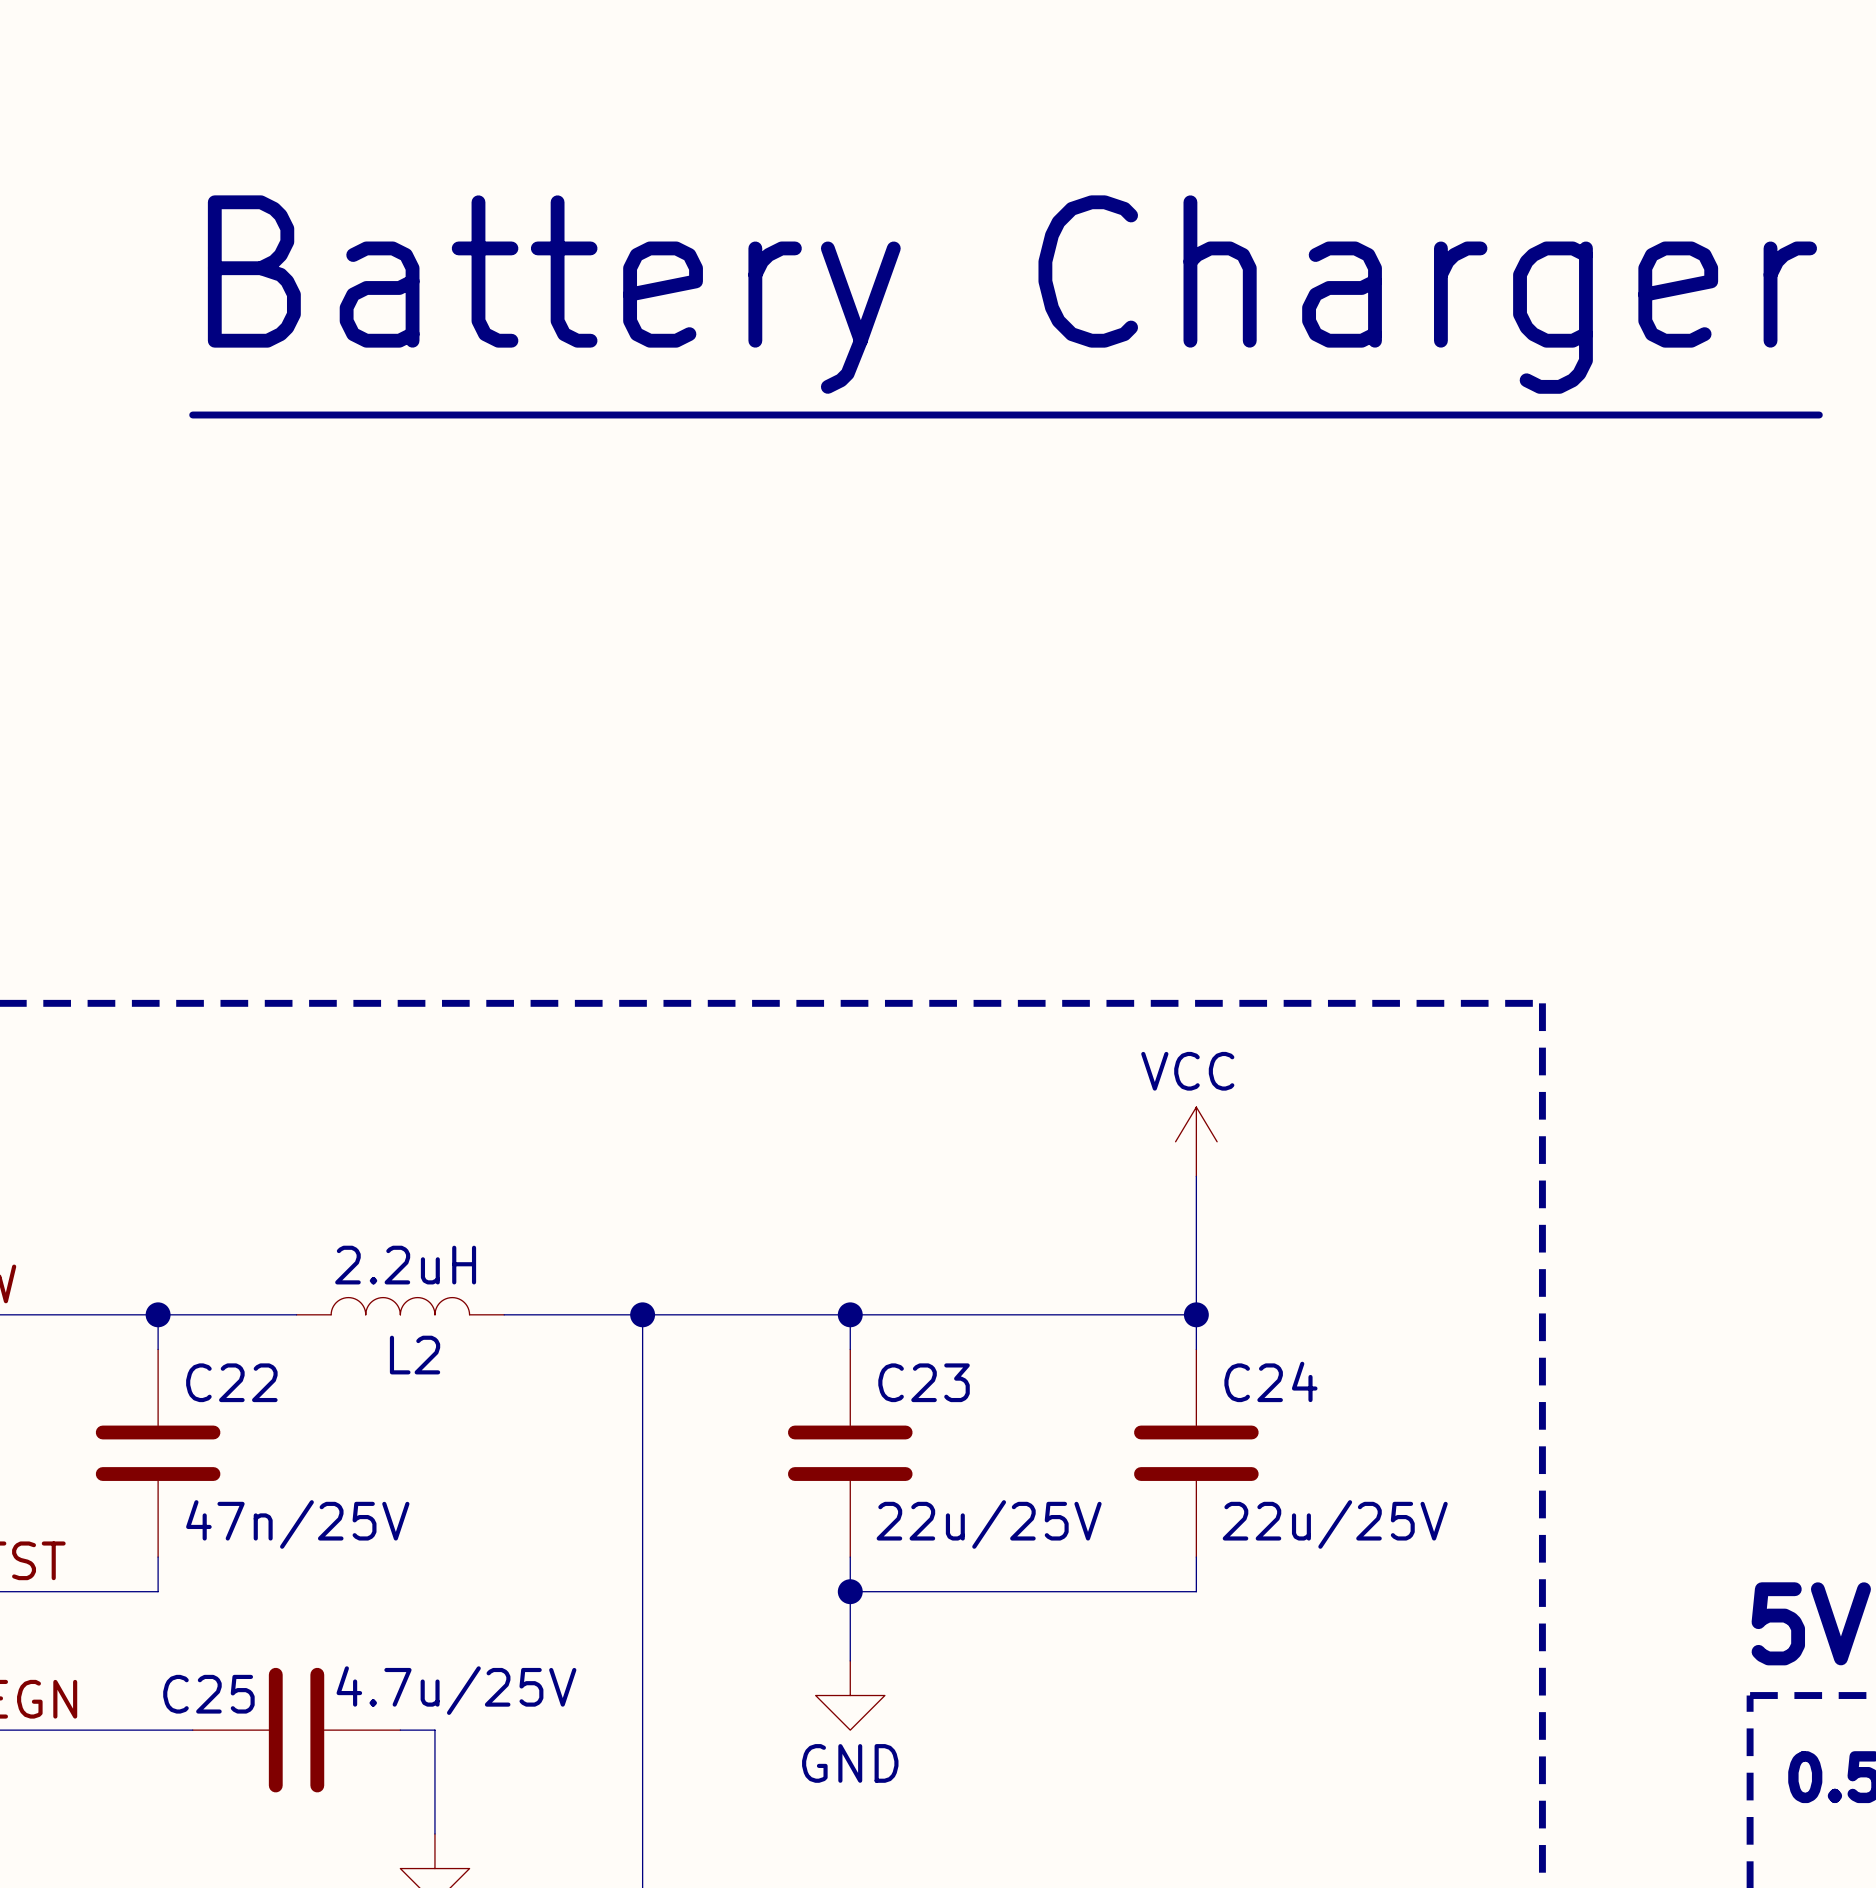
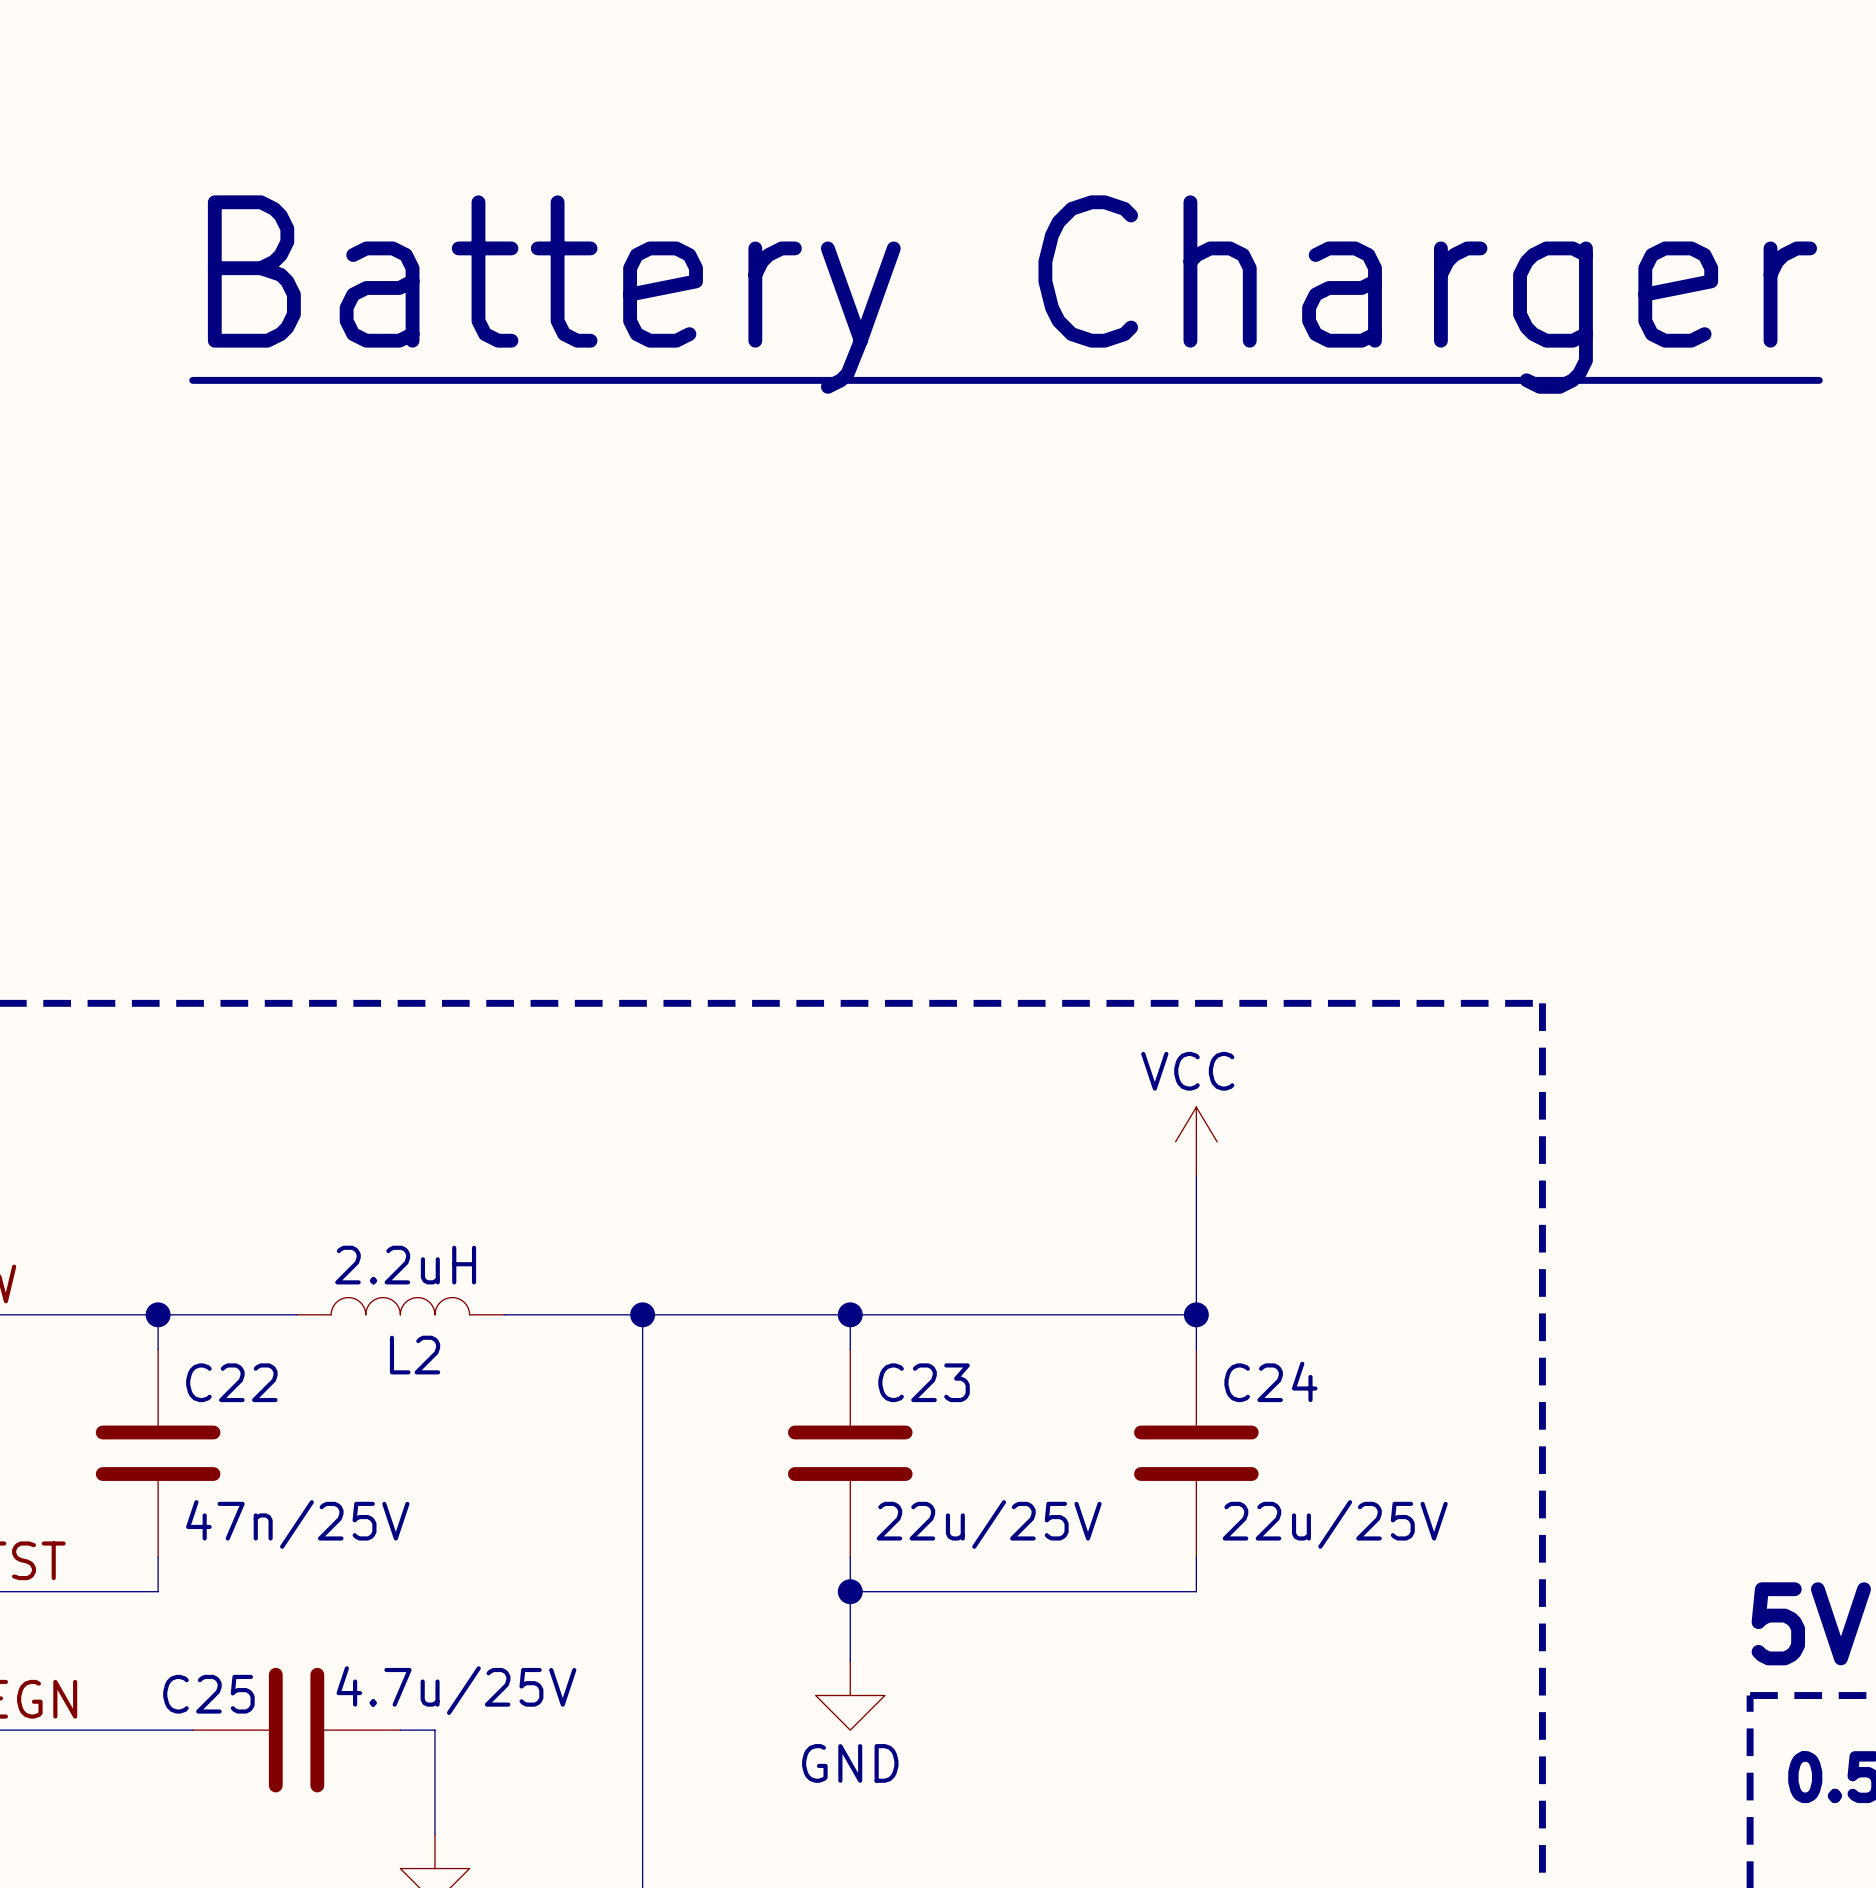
line: (192, 415) (1819, 415) -> (192, 380) (1819, 380)

